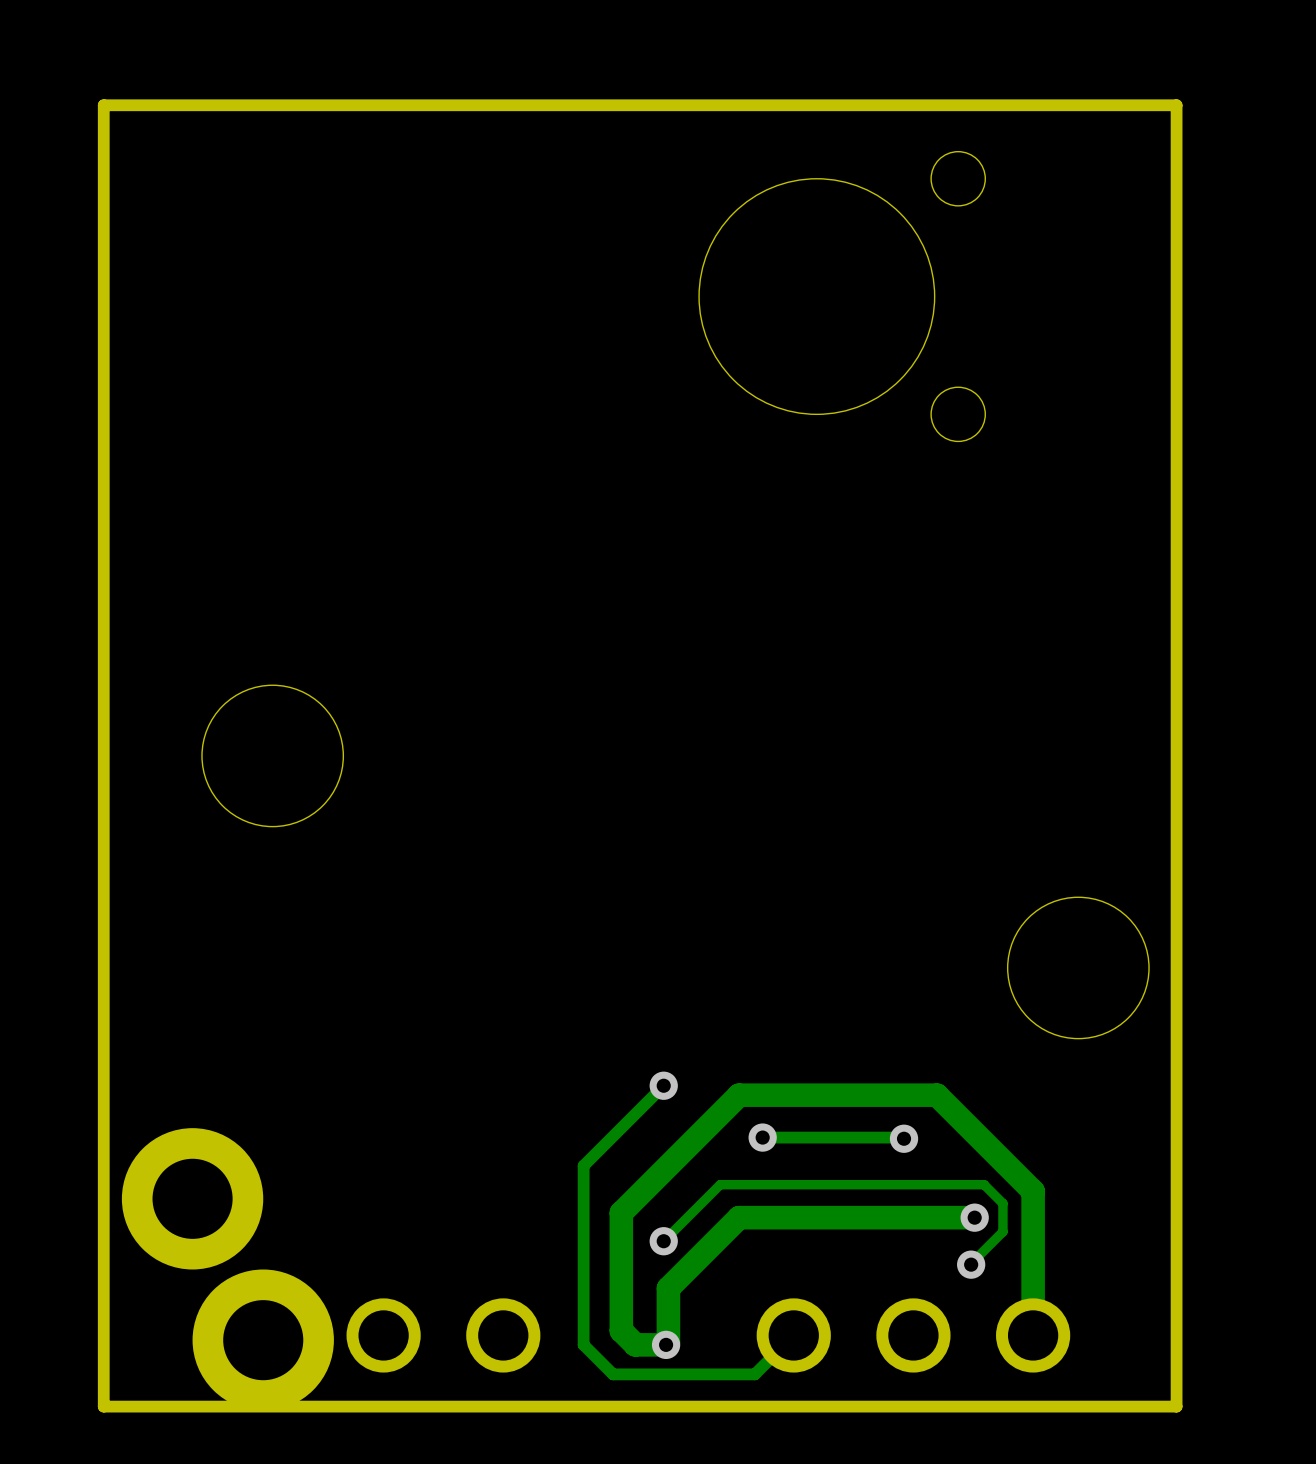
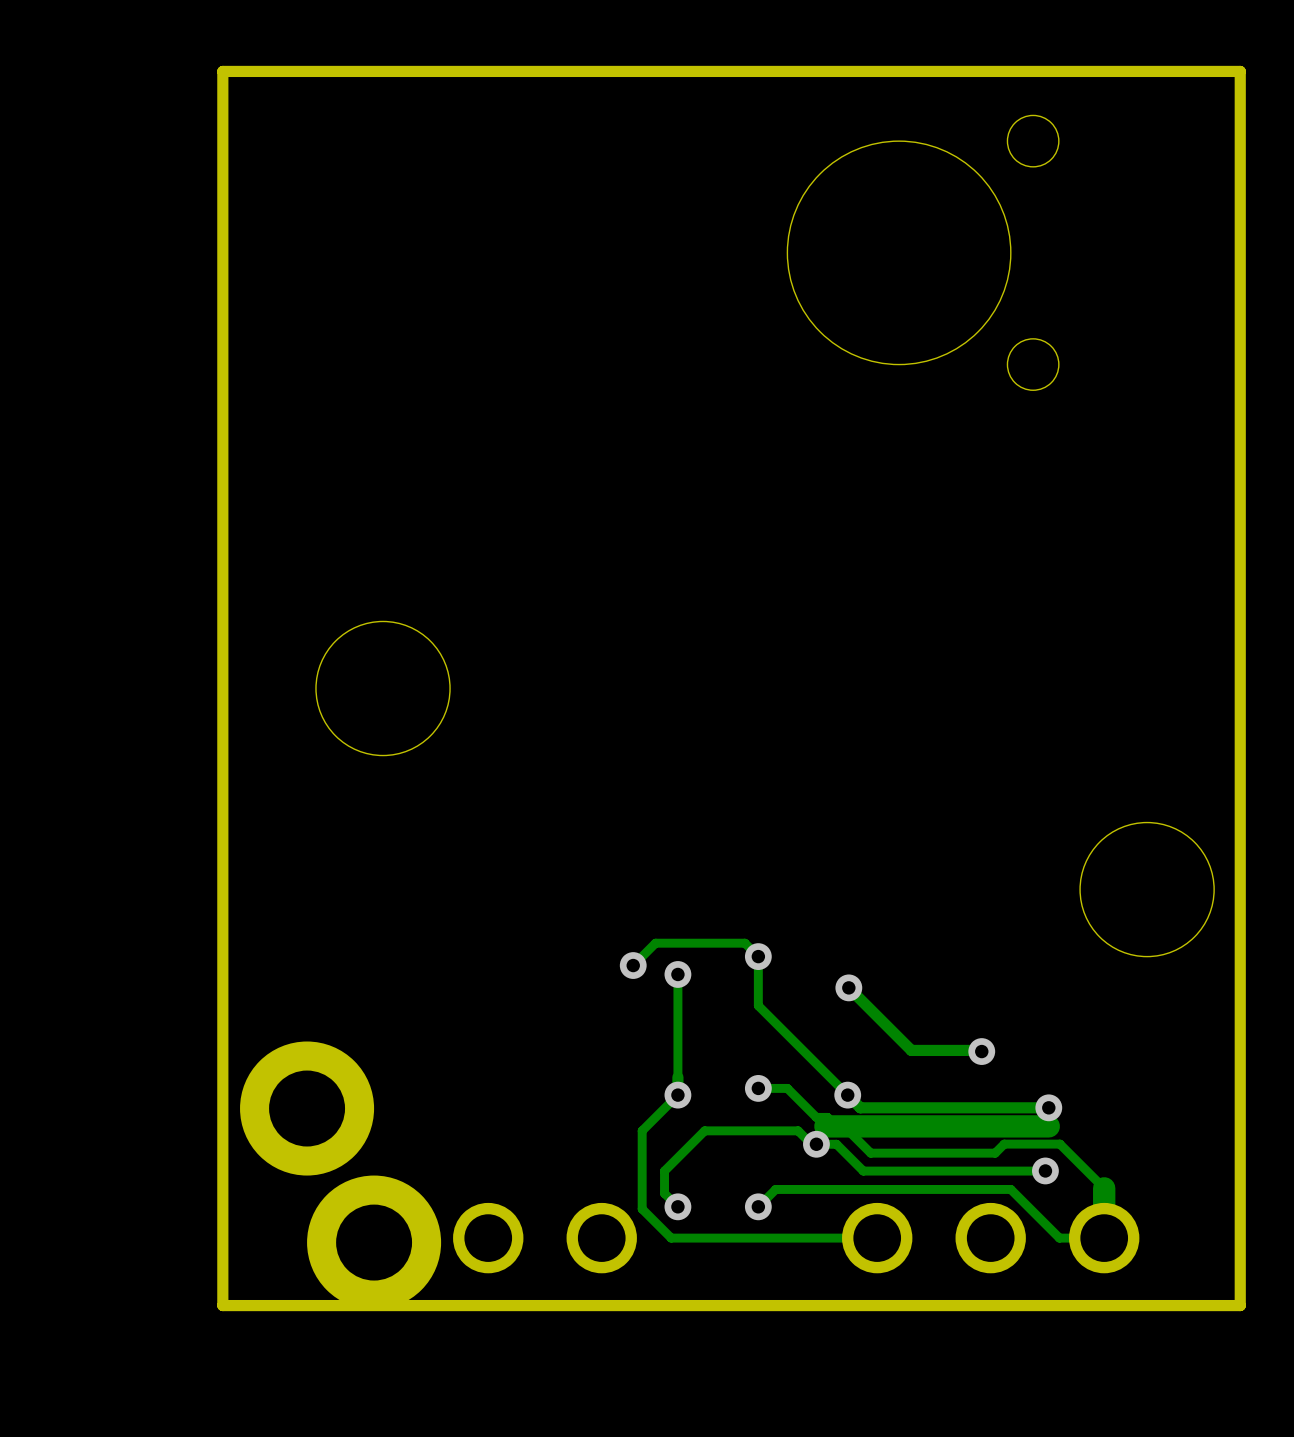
via: none -> (758, 956)
track: none -> (633, 965) (655, 943) (744, 943) (758, 956) (758, 1005) (860, 1107) (1048, 1107)
via: none -> (633, 965)
via: none -> (677, 974)
via: none -> (848, 987)
track: (663, 1085) (583, 1165) -> (677, 974) (677, 1077)
via: (663, 1085) -> none
via: (762, 1137) -> none
track: (829, 1137) (762, 1137) -> (911, 1050) (848, 987)
track: none -> (758, 1088) (787, 1088) (816, 1117) (827, 1117) (836, 1126)
via: none -> (758, 1088)
track: (583, 1184) (583, 1344) (613, 1374) (754, 1374) (793, 1335) -> (677, 1095) (642, 1130) (642, 1209) (671, 1238) (877, 1238)
via: none -> (677, 1095)
via: none -> (847, 1095)
track: (739, 1217) (668, 1288) (668, 1342) (666, 1344) (635, 1344) (621, 1330) (621, 1212) (739, 1095) (937, 1095) (1033, 1191) (1033, 1282) -> (843, 1126) (870, 1153) (995, 1153) (1004, 1144) (1059, 1144) (1104, 1188)
via position: (974, 1217) -> (1048, 1107)
via: none -> (816, 1144)
track: (663, 1241) (720, 1184) (984, 1184) (1002, 1203) (1002, 1231) (971, 1263) -> (677, 1206) (664, 1193) (664, 1171) (704, 1130) (798, 1130) (811, 1144) (836, 1144) (863, 1171) (1045, 1171)
via: (663, 1241) -> none
via: none -> (677, 1206)
track: none -> (758, 1206) (775, 1189) (1010, 1189) (1059, 1238) (1104, 1238)
via: none -> (758, 1206)
via: (666, 1344) -> none

